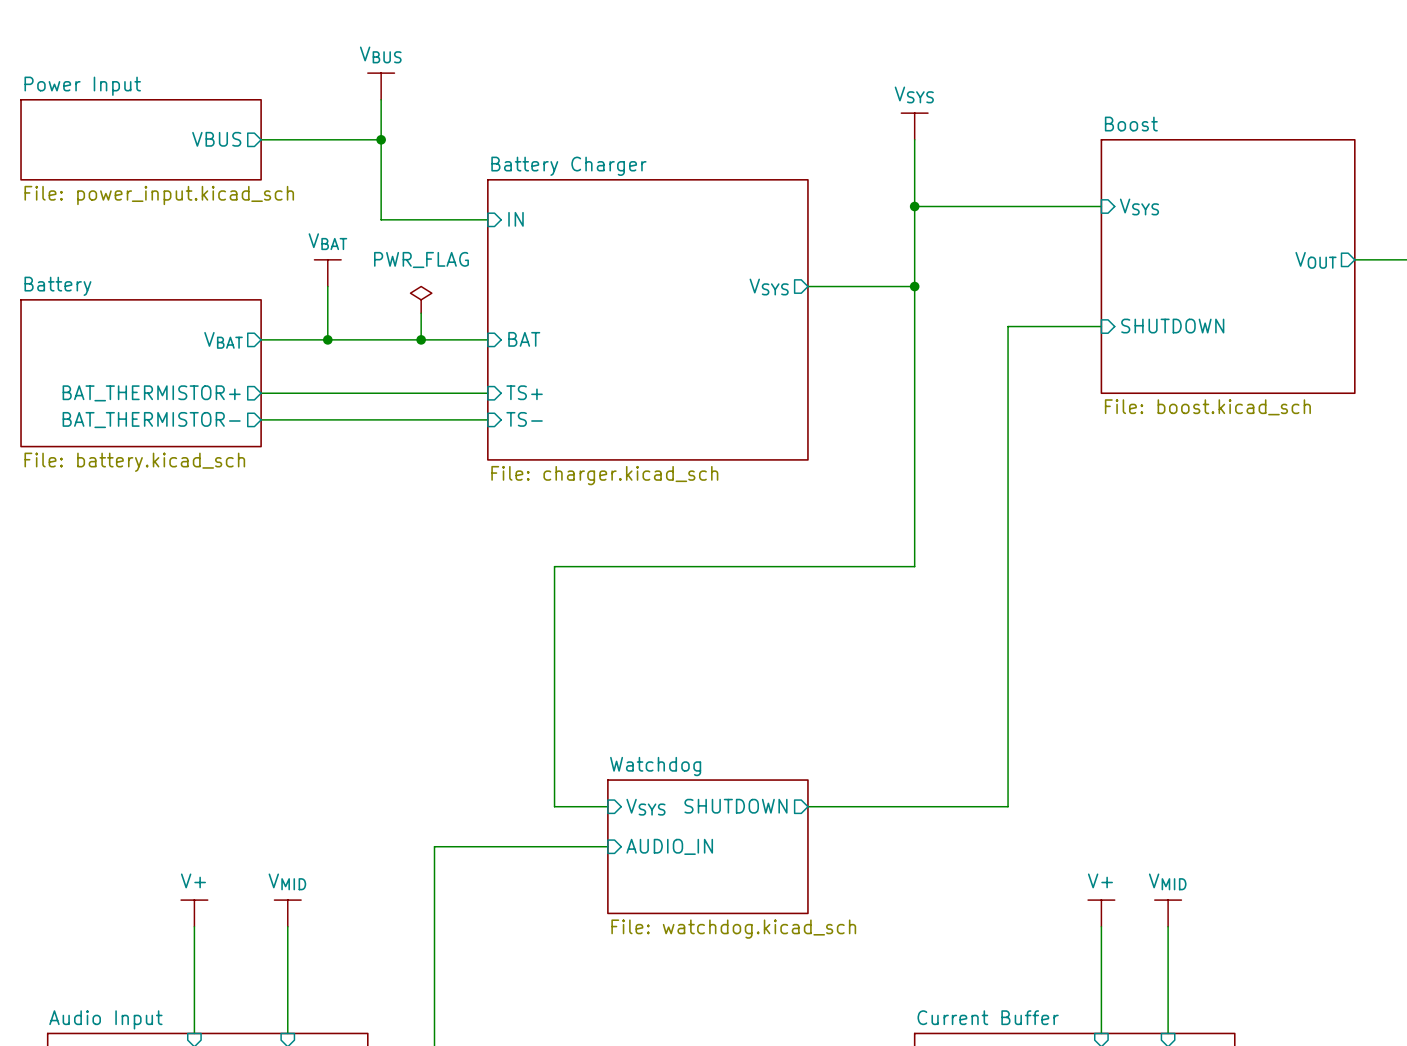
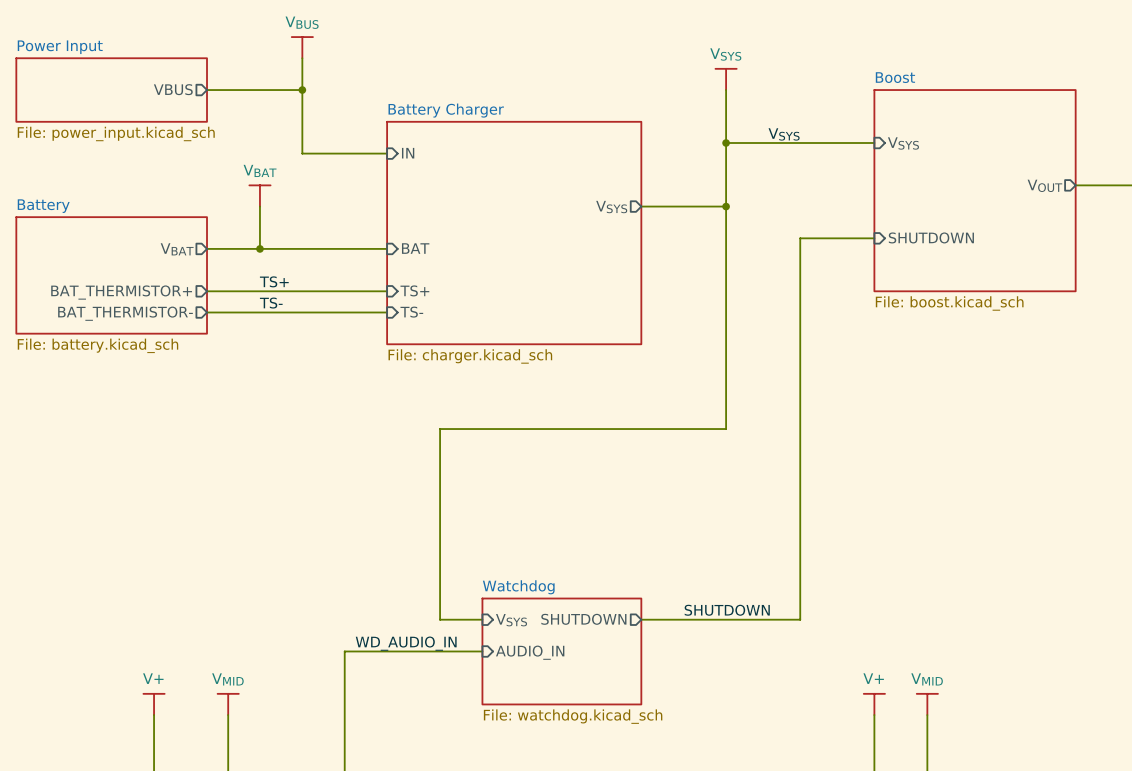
label: none -> VSYS (784, 134)
power symbol: PWR_FLAG (421, 299) -> none
wire: (421, 313) (421, 339) -> none
junction: (421, 339) -> none
label: none -> TS+ (274, 281)
label: none -> TS- (271, 303)
label: none -> SHUTDOWN (727, 610)
label: none -> WD_AUDIO_IN (406, 643)

